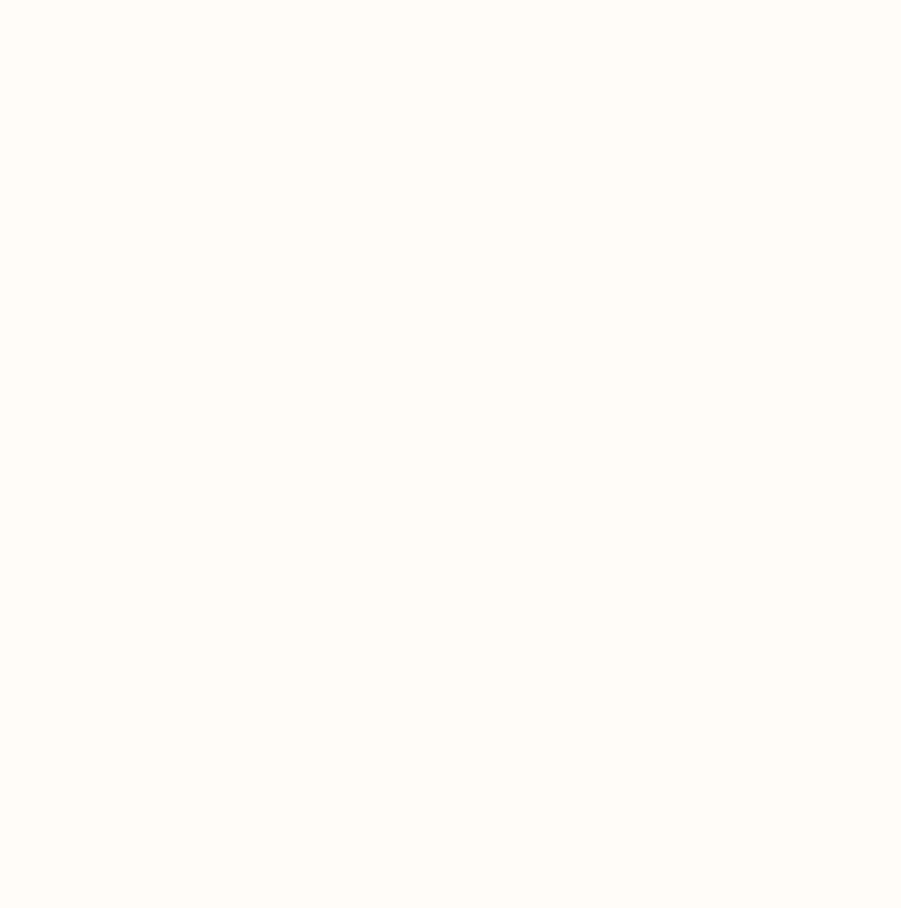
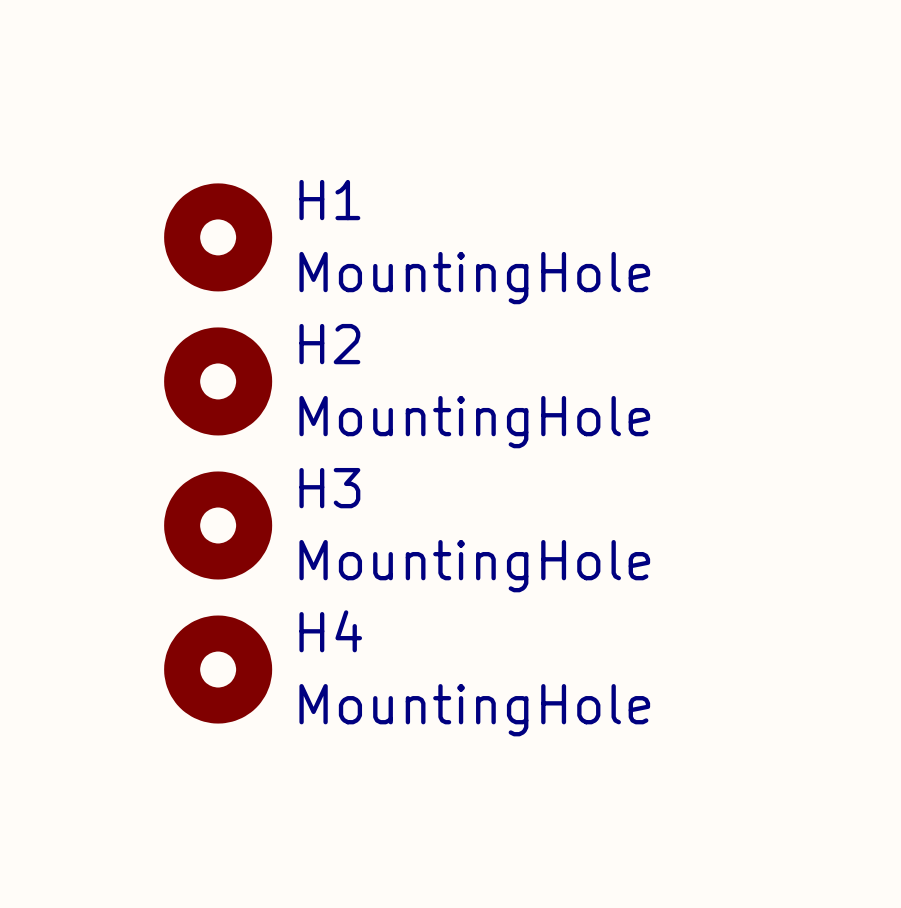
H1: none -> MountingHole (218, 237)
H2: none -> MountingHole (218, 381)
H3: none -> MountingHole (218, 525)
H4: none -> MountingHole (218, 669)

